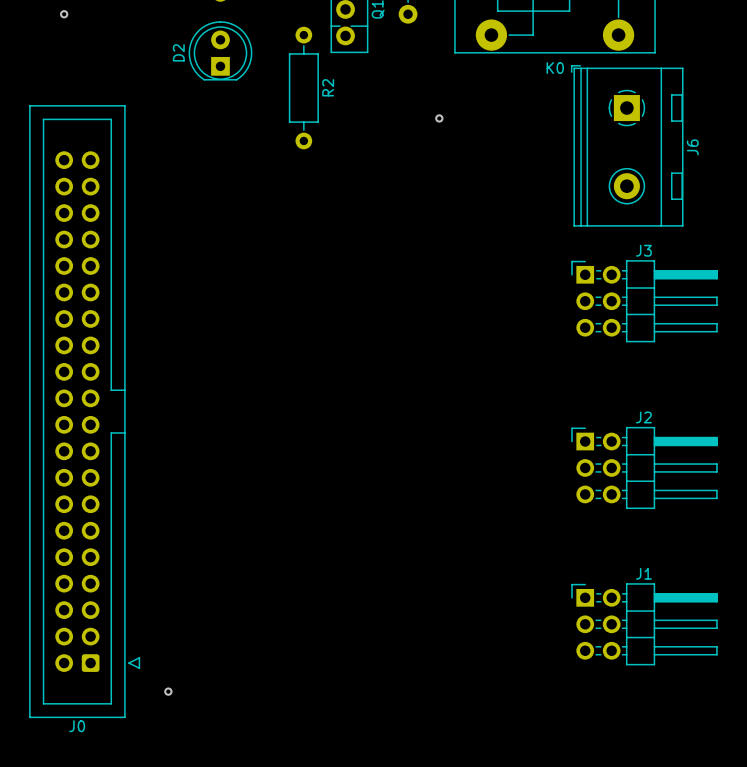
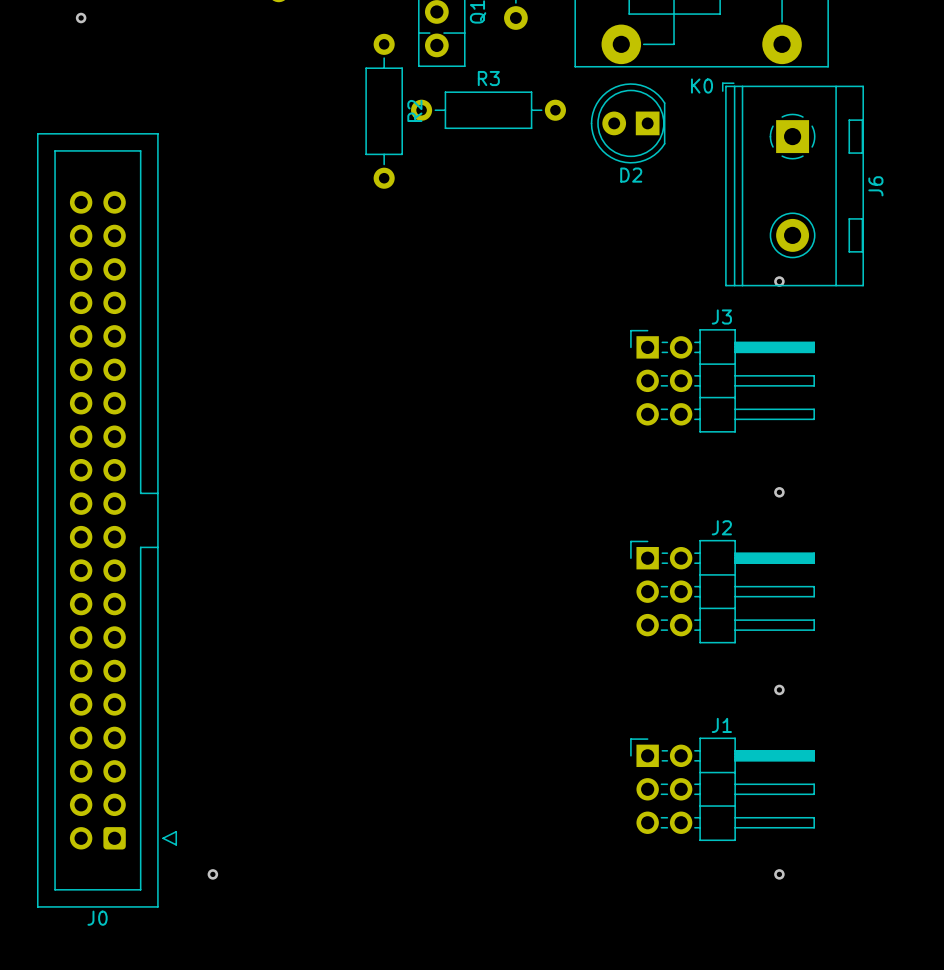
D2 rotation: 0° (220, 50) -> 90° counterclockwise (628, 123)
D2 position: (220, 50) -> (628, 123)
R3: none -> (488, 110)
via: (439, 118) -> none
via: none -> (779, 281)
J3 position: (644, 301) -> (722, 380)
via: none -> (779, 492)
J2 position: (644, 467) -> (722, 591)
via: none -> (779, 689)
J1 position: (644, 624) -> (722, 789)
via: none -> (779, 874)

